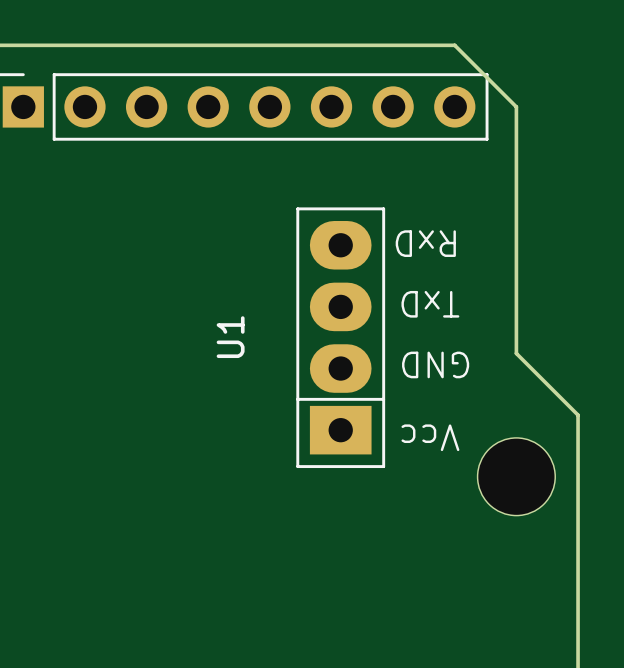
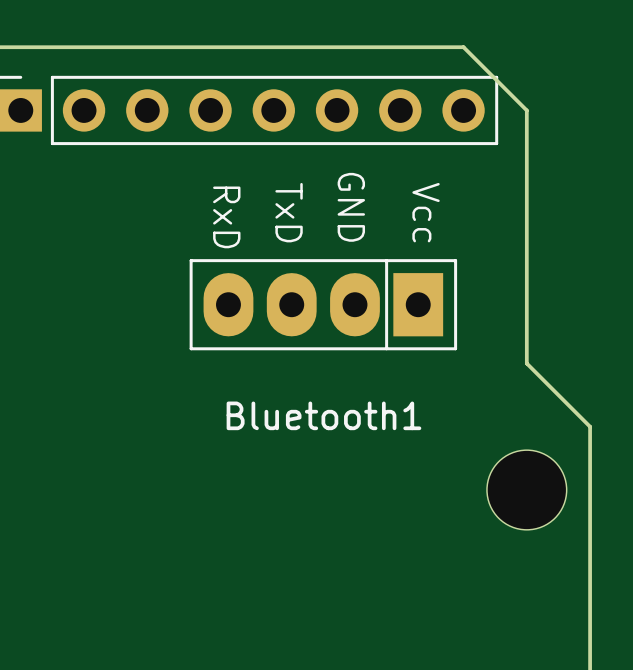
Bluetooth1: none -> (323, 304)
U1: (340, 337) -> none

